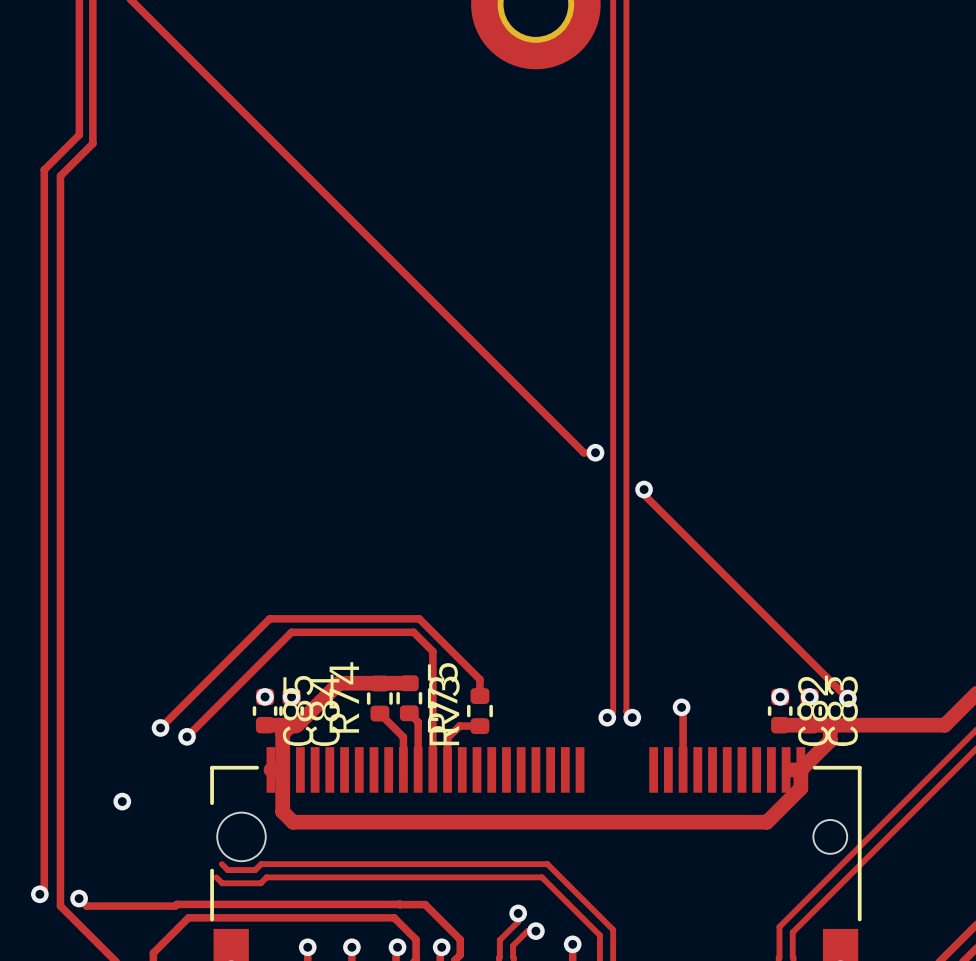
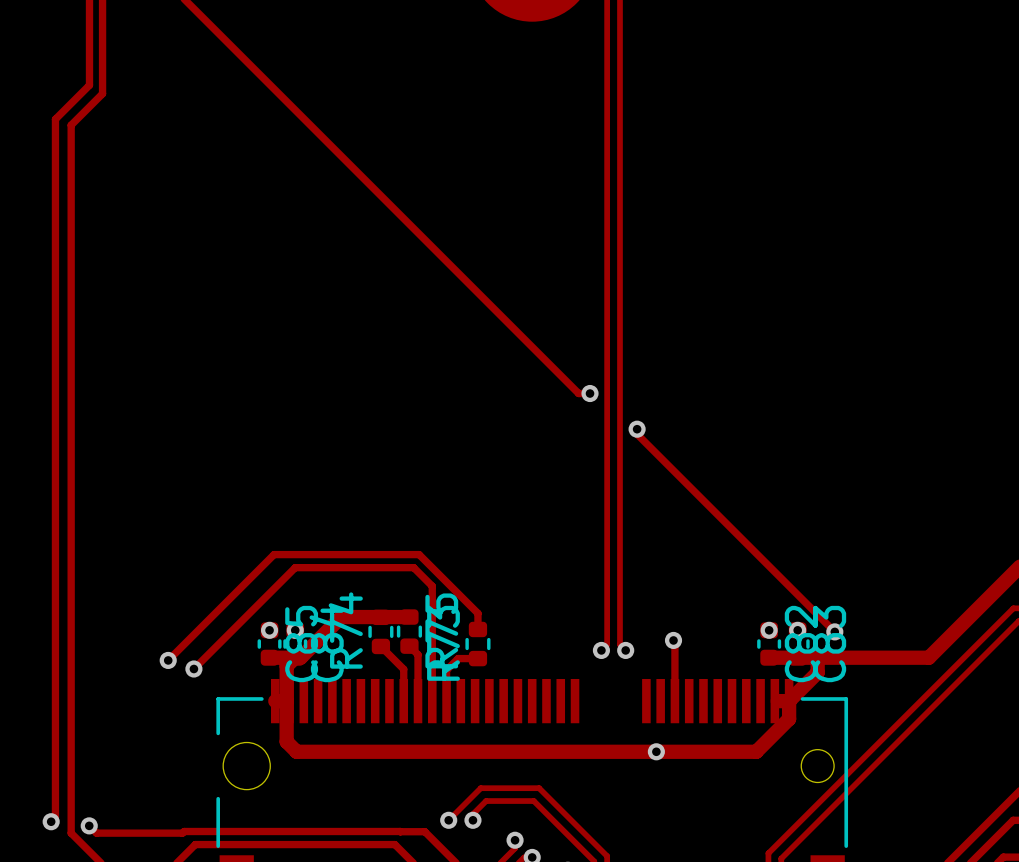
via: (122, 801) -> none
via: none -> (656, 751)
track: (221, 864) (227, 870) (255, 870) (261, 864) (547, 864) -> (448, 820) (480, 788) (539, 788) (543, 792)
track: (216, 877) (222, 883) (260, 883) (266, 877) (541, 877) -> (472, 820) (472, 814) (486, 801) (533, 801) (538, 805)
via: none -> (448, 820)
via: none -> (472, 820)

